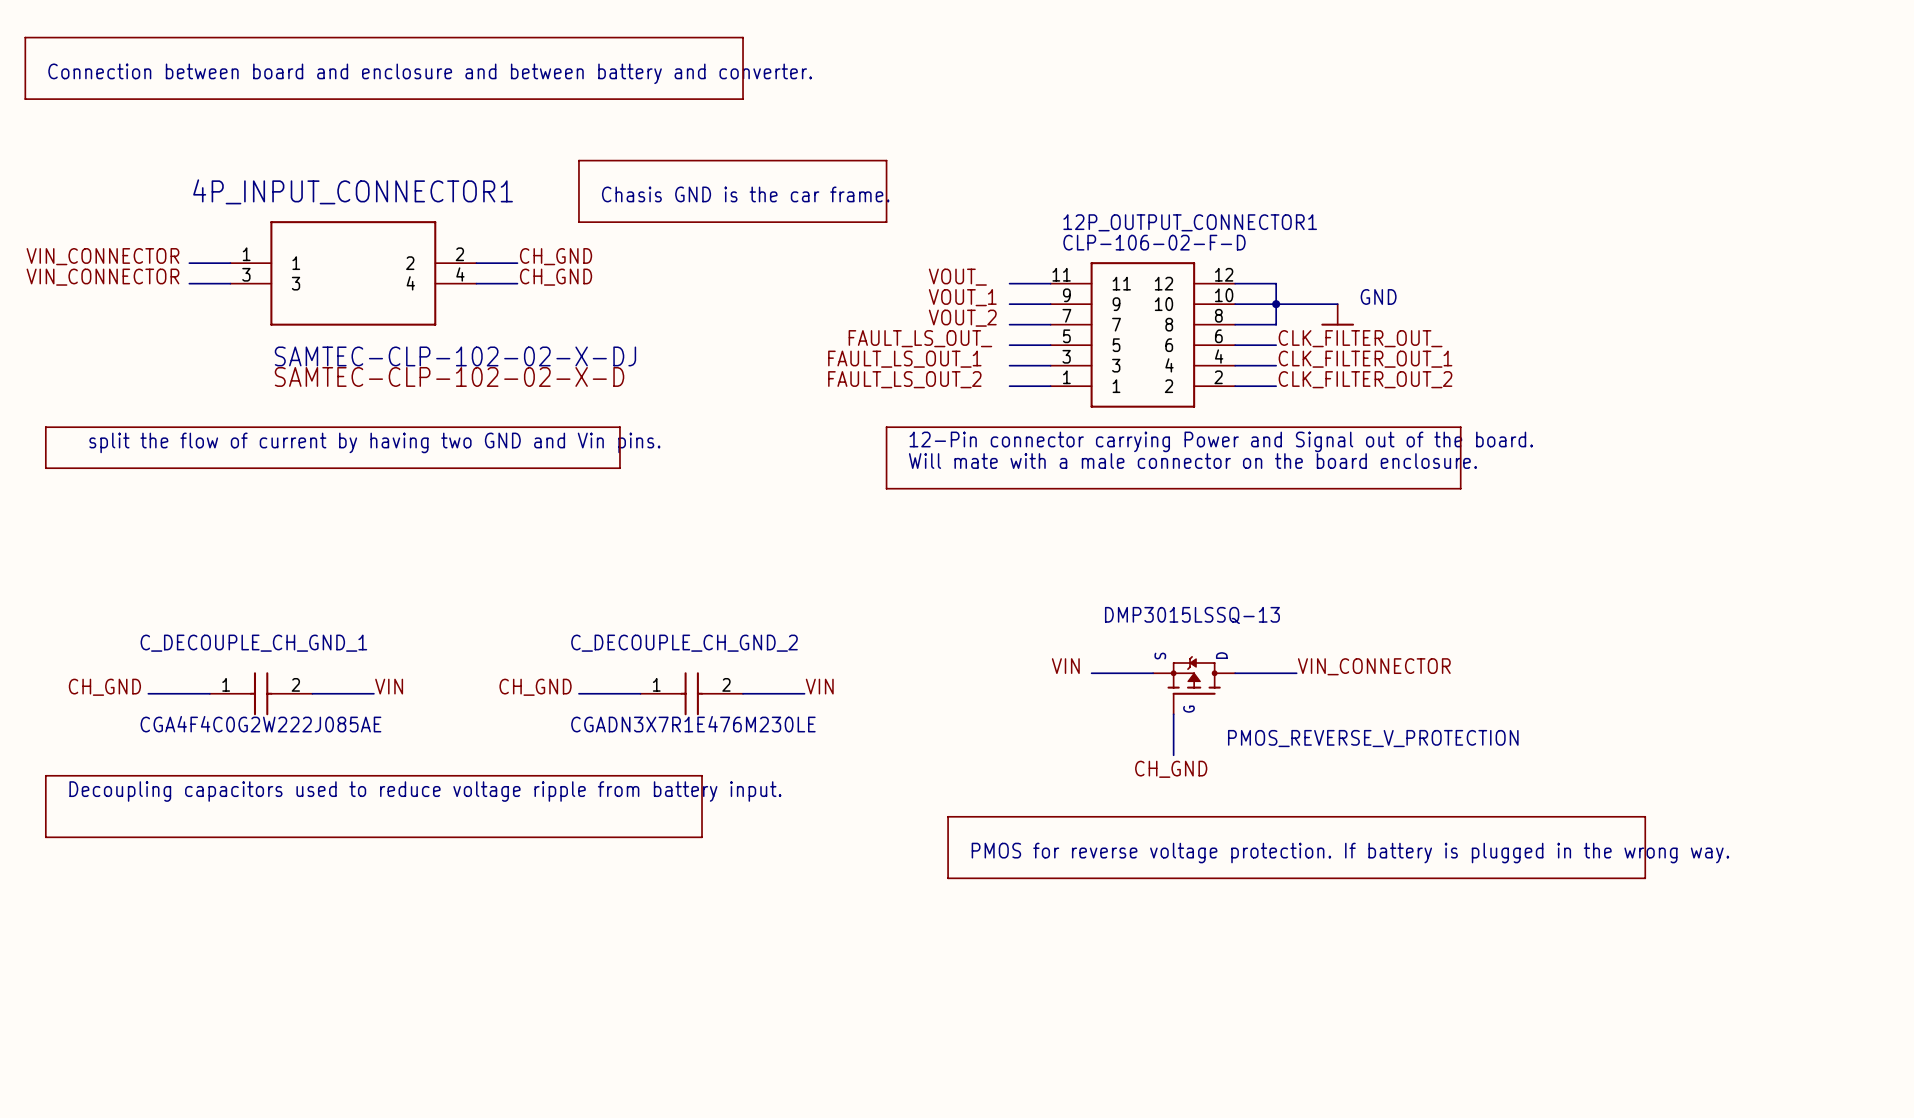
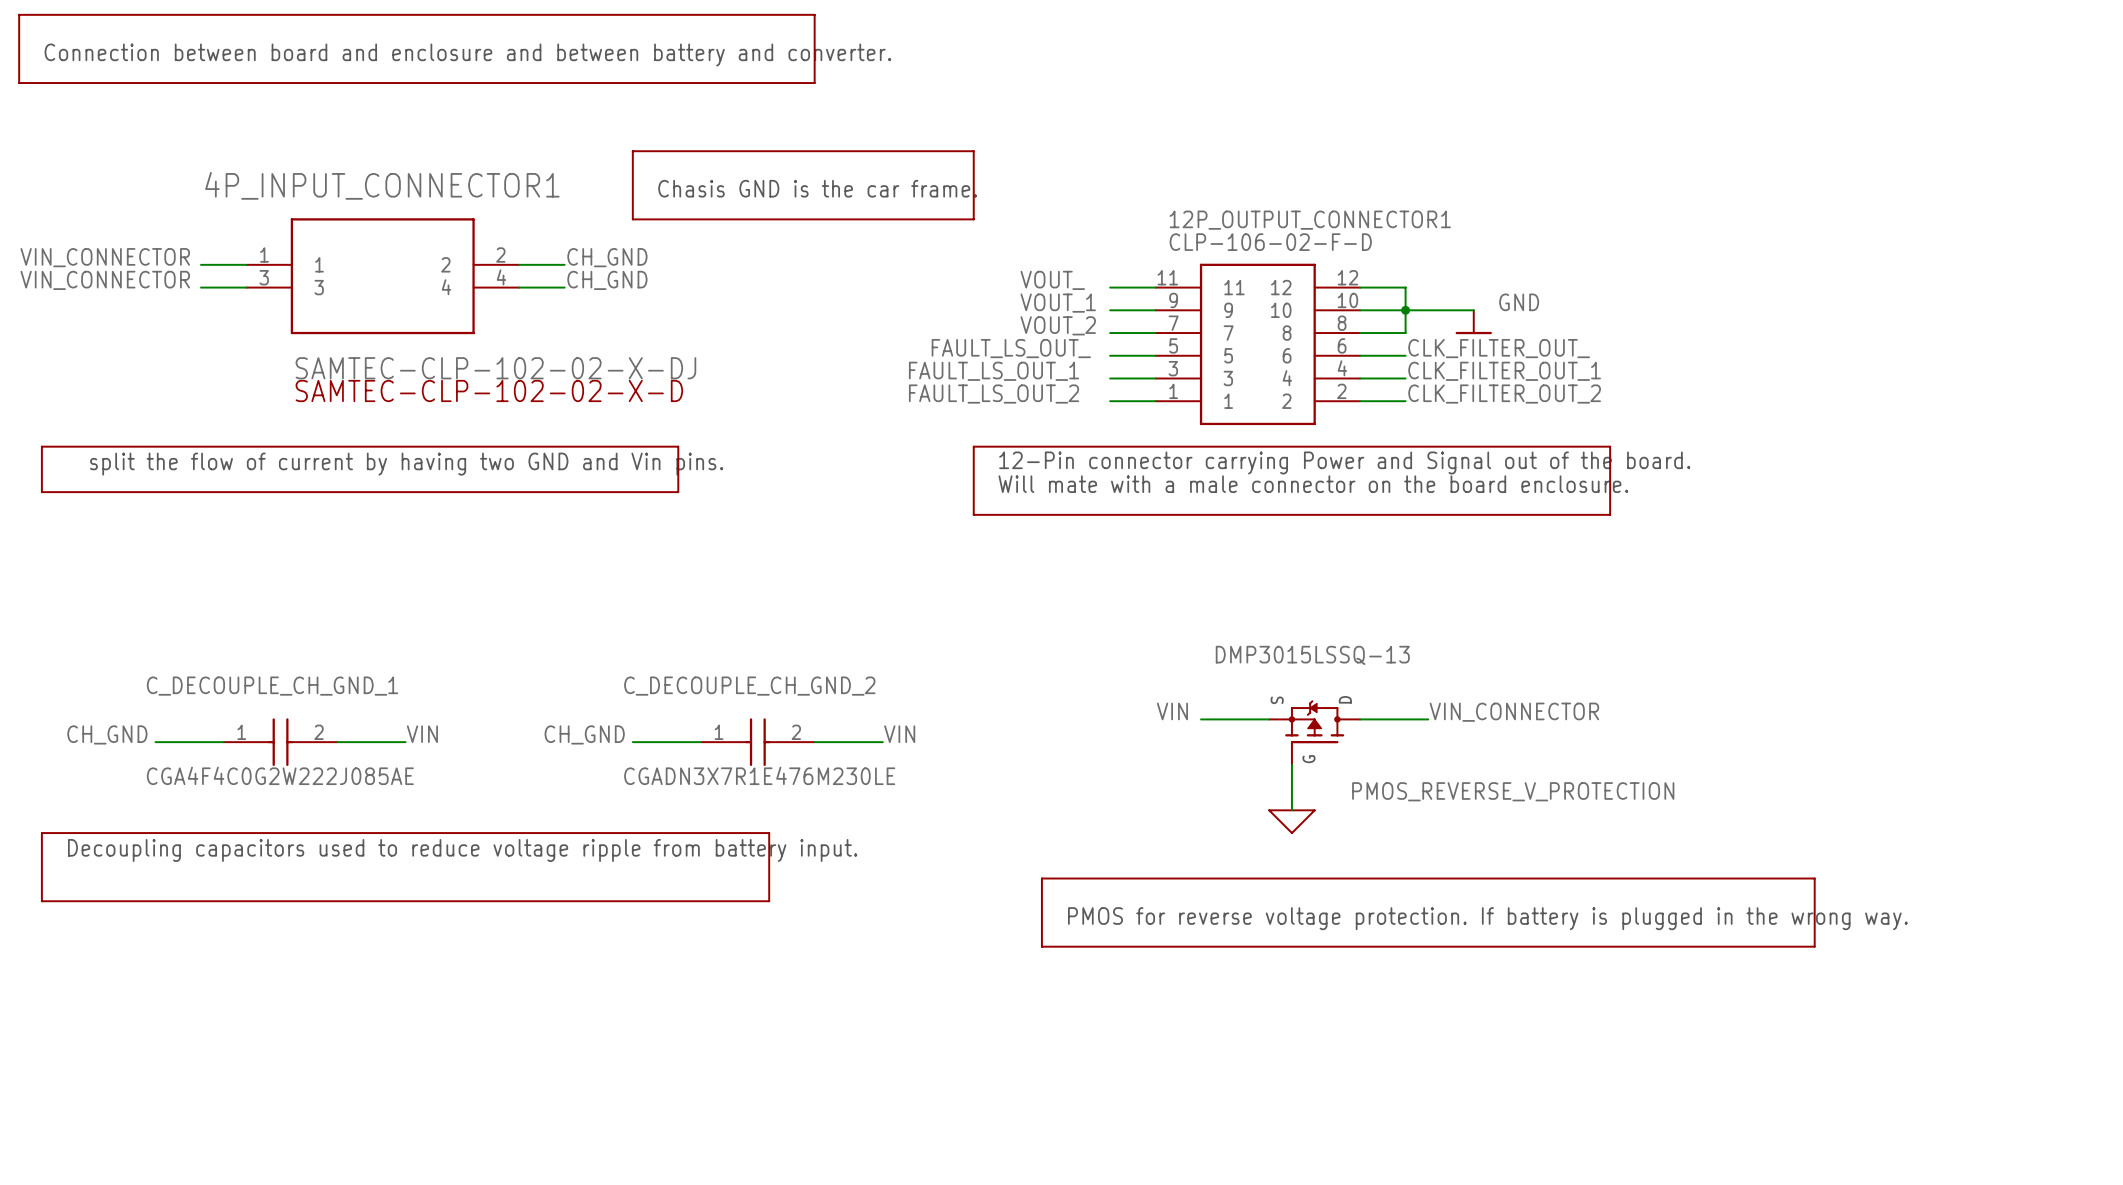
power symbol: none -> (1291, 821)
label: CH_GND (1171, 769) -> none

